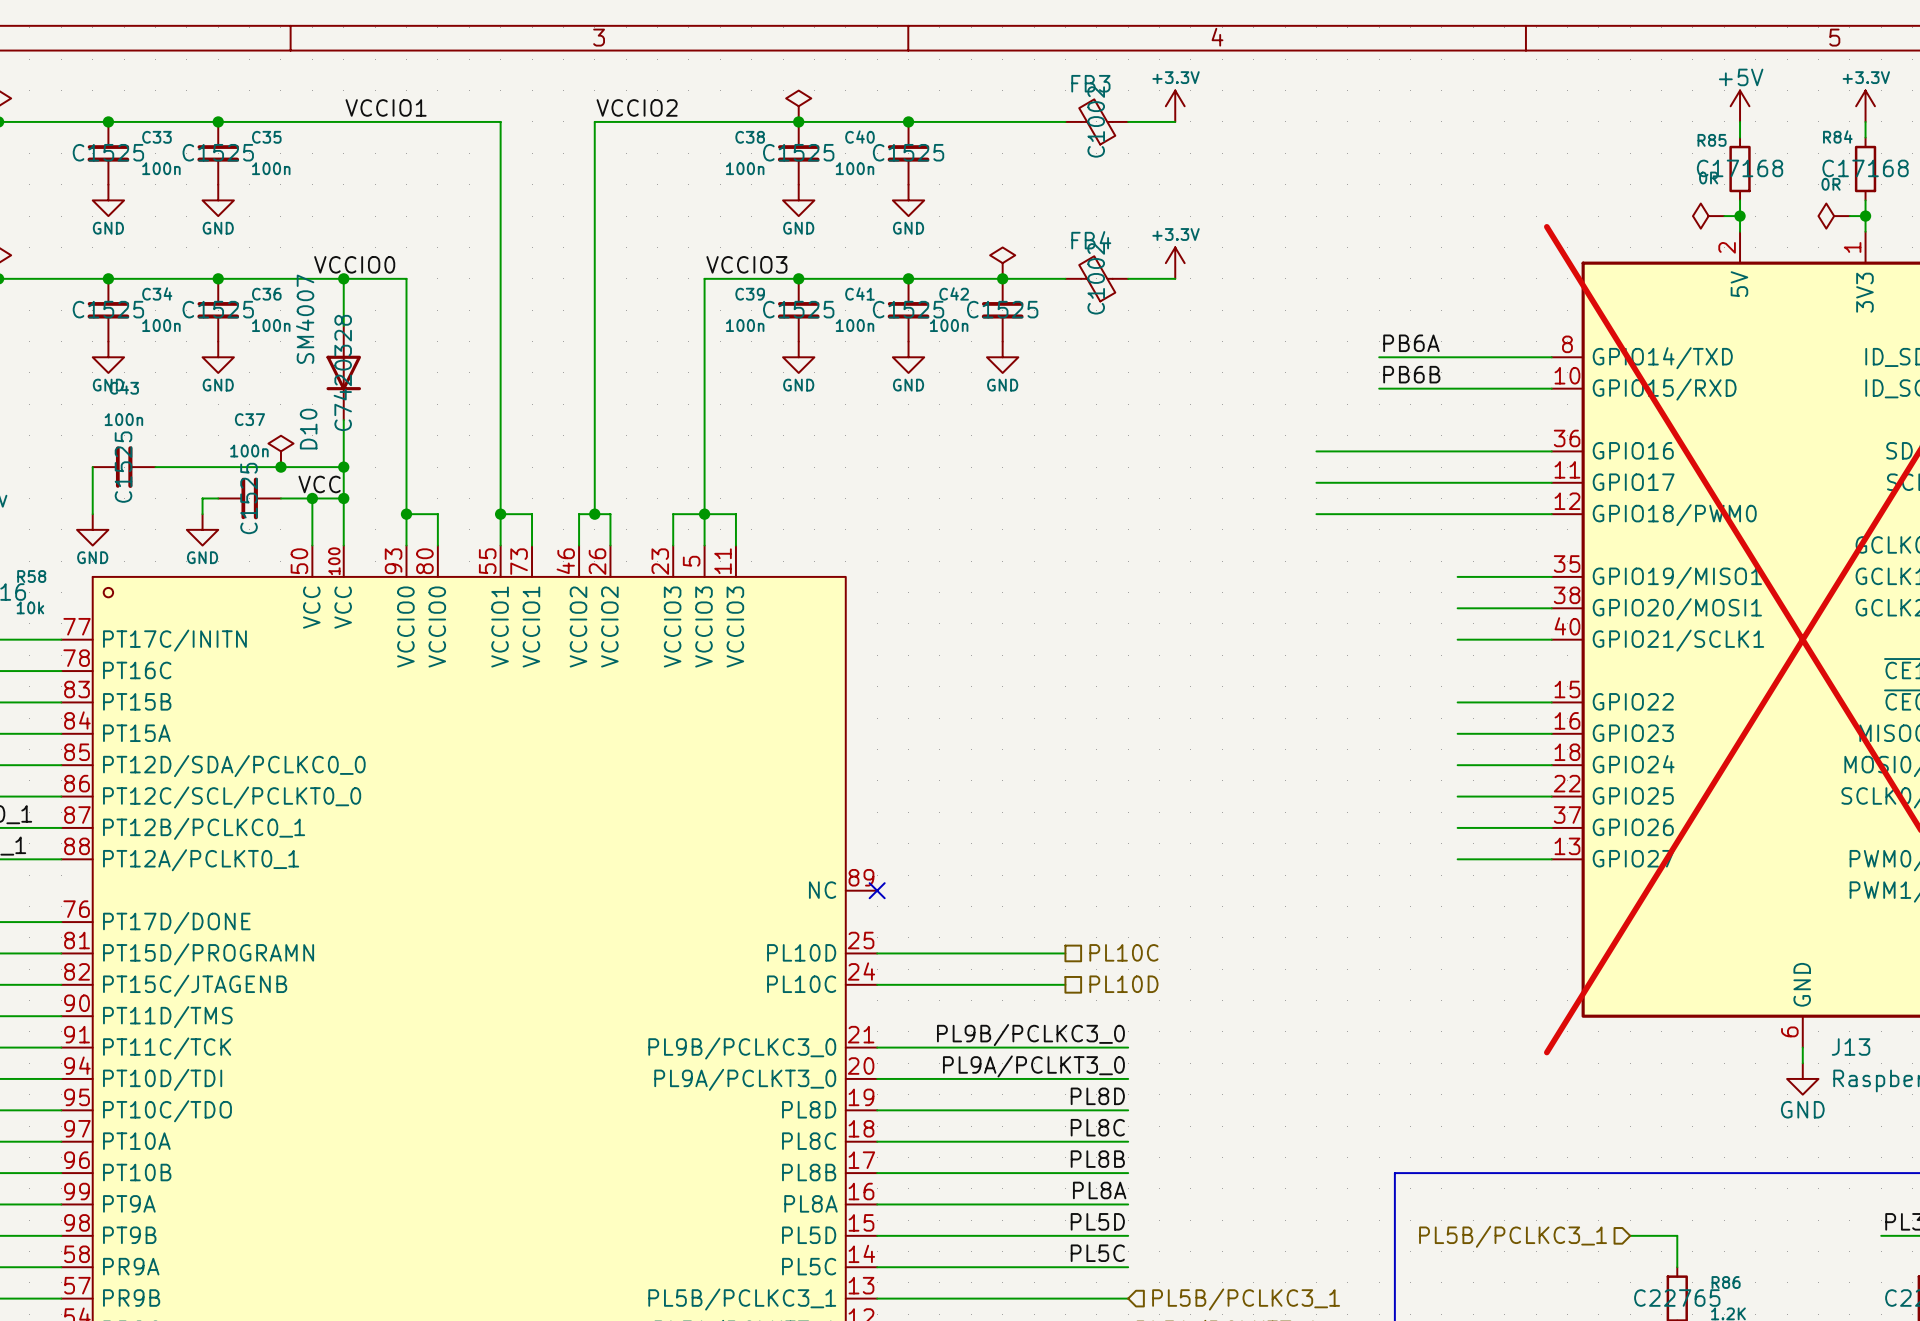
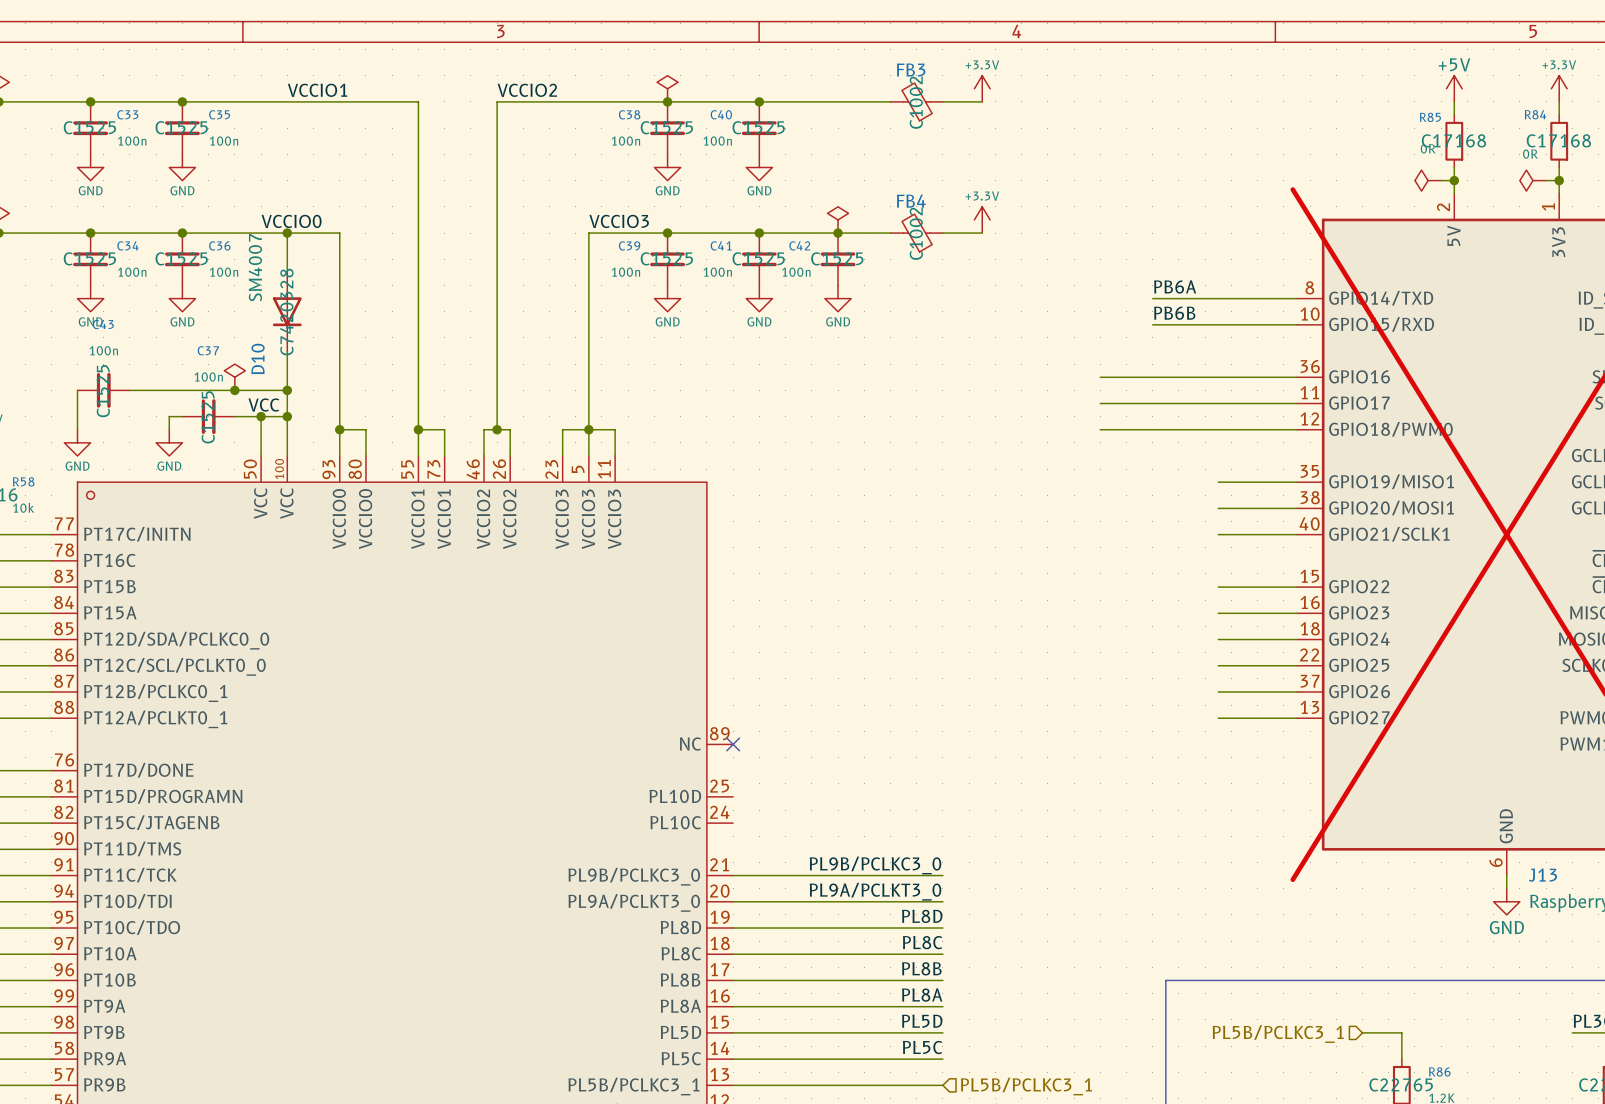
hierarchical label: PL10C (1123, 952) -> none
wire: (877, 953) (1065, 953) -> none
wire: (877, 984) (1065, 984) -> none
hierarchical label: PL10D (1123, 984) -> none

